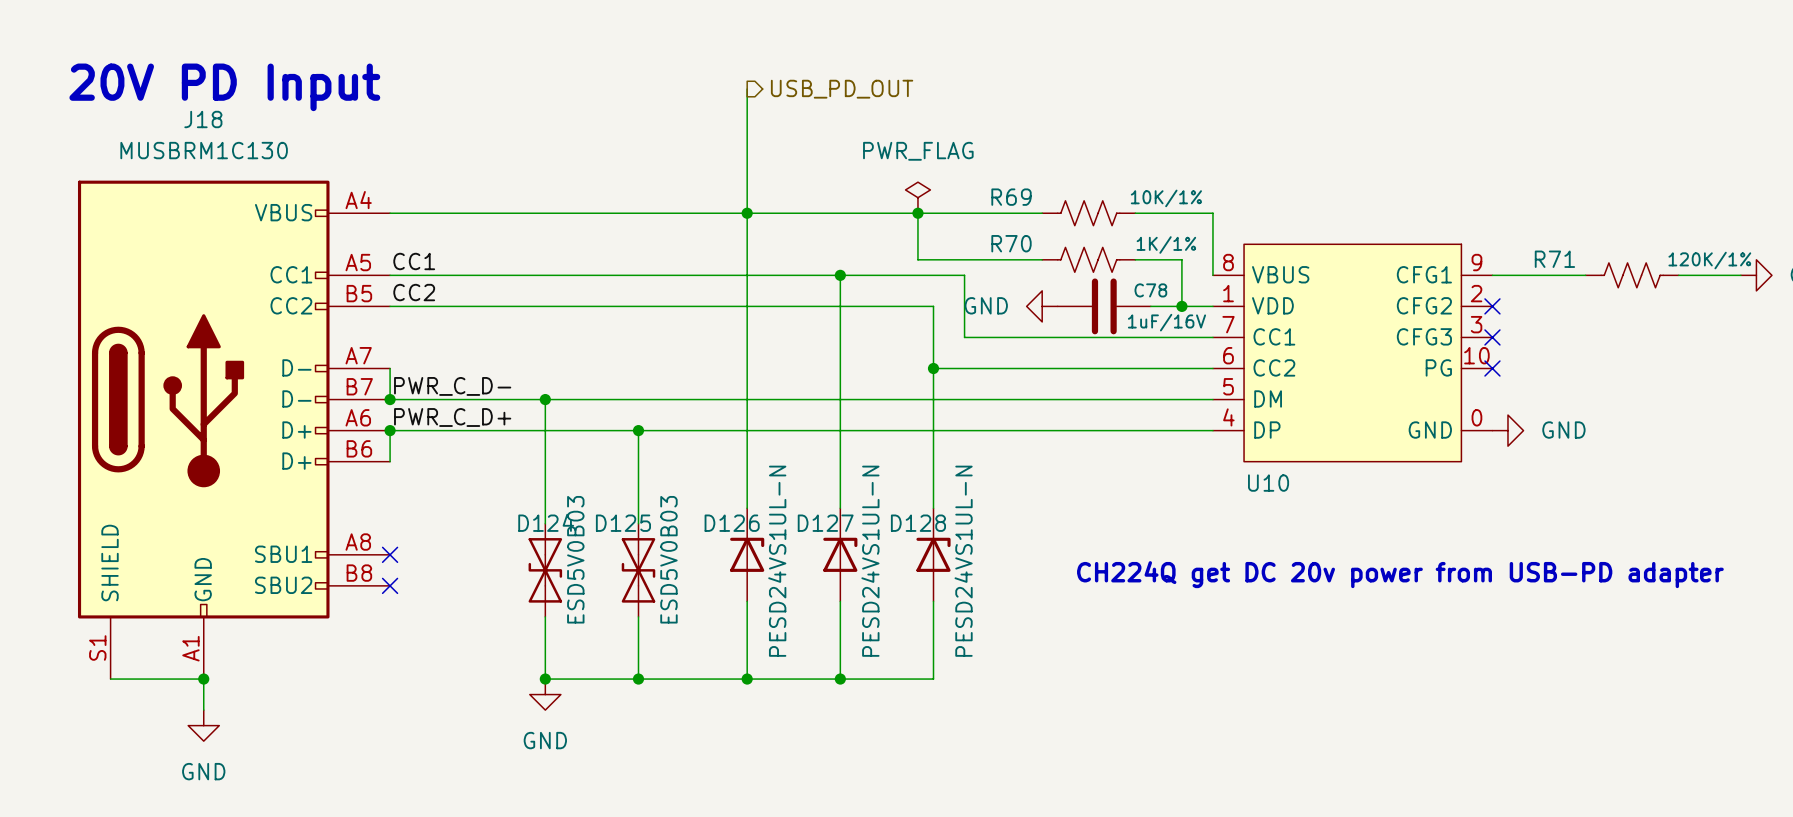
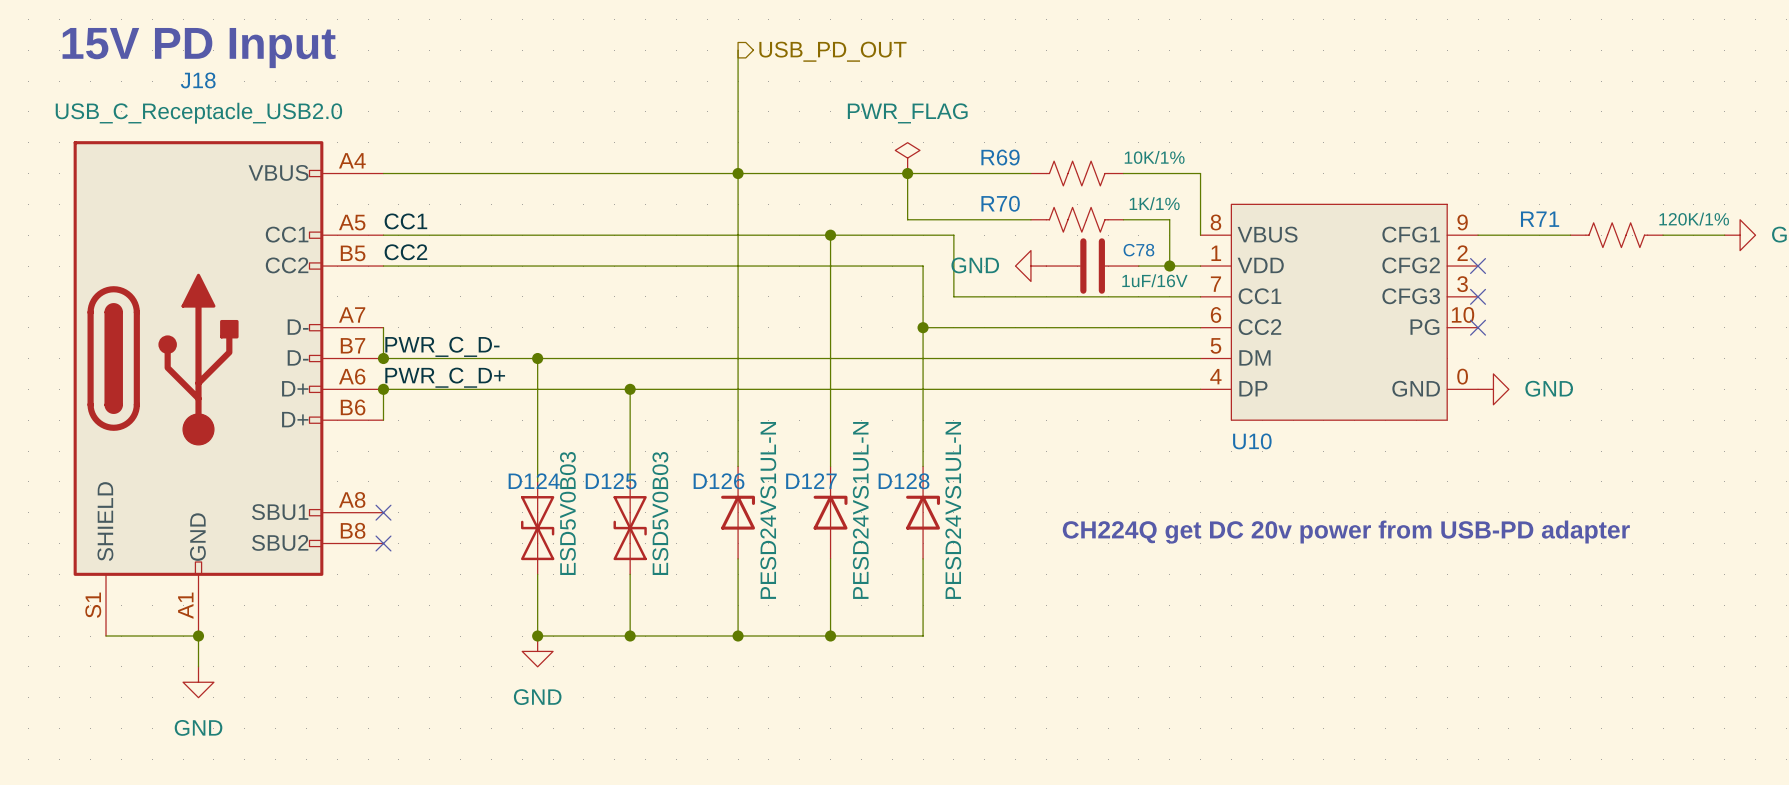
text: 20V PD Input (224, 87) -> 15V PD Input (199, 48)
J18 value: MUSBRM1C130 (204, 150) -> USB_C_Receptacle_USB2.0 (198, 113)

